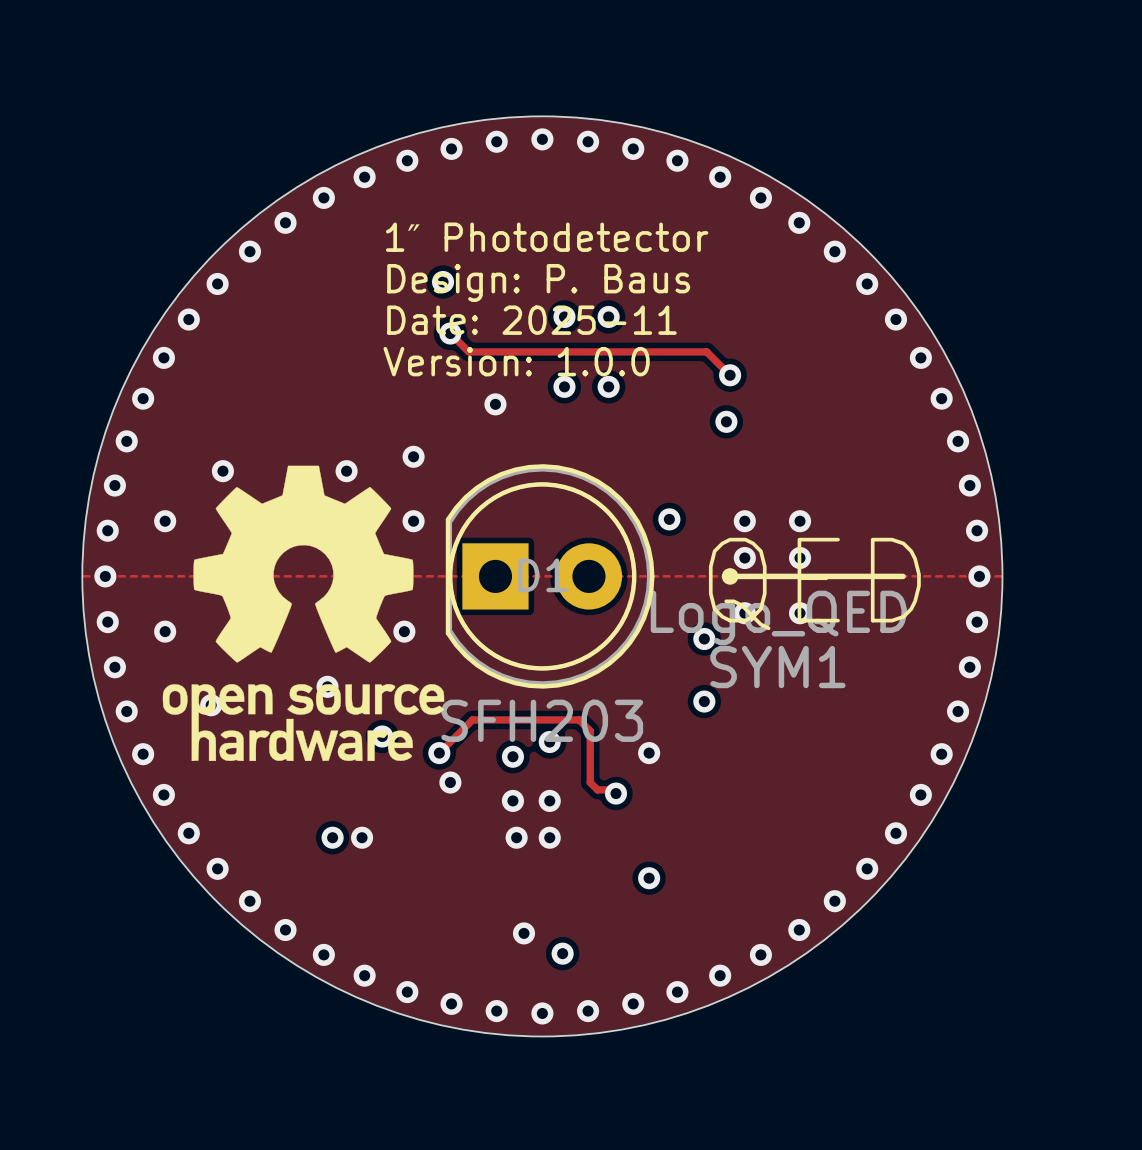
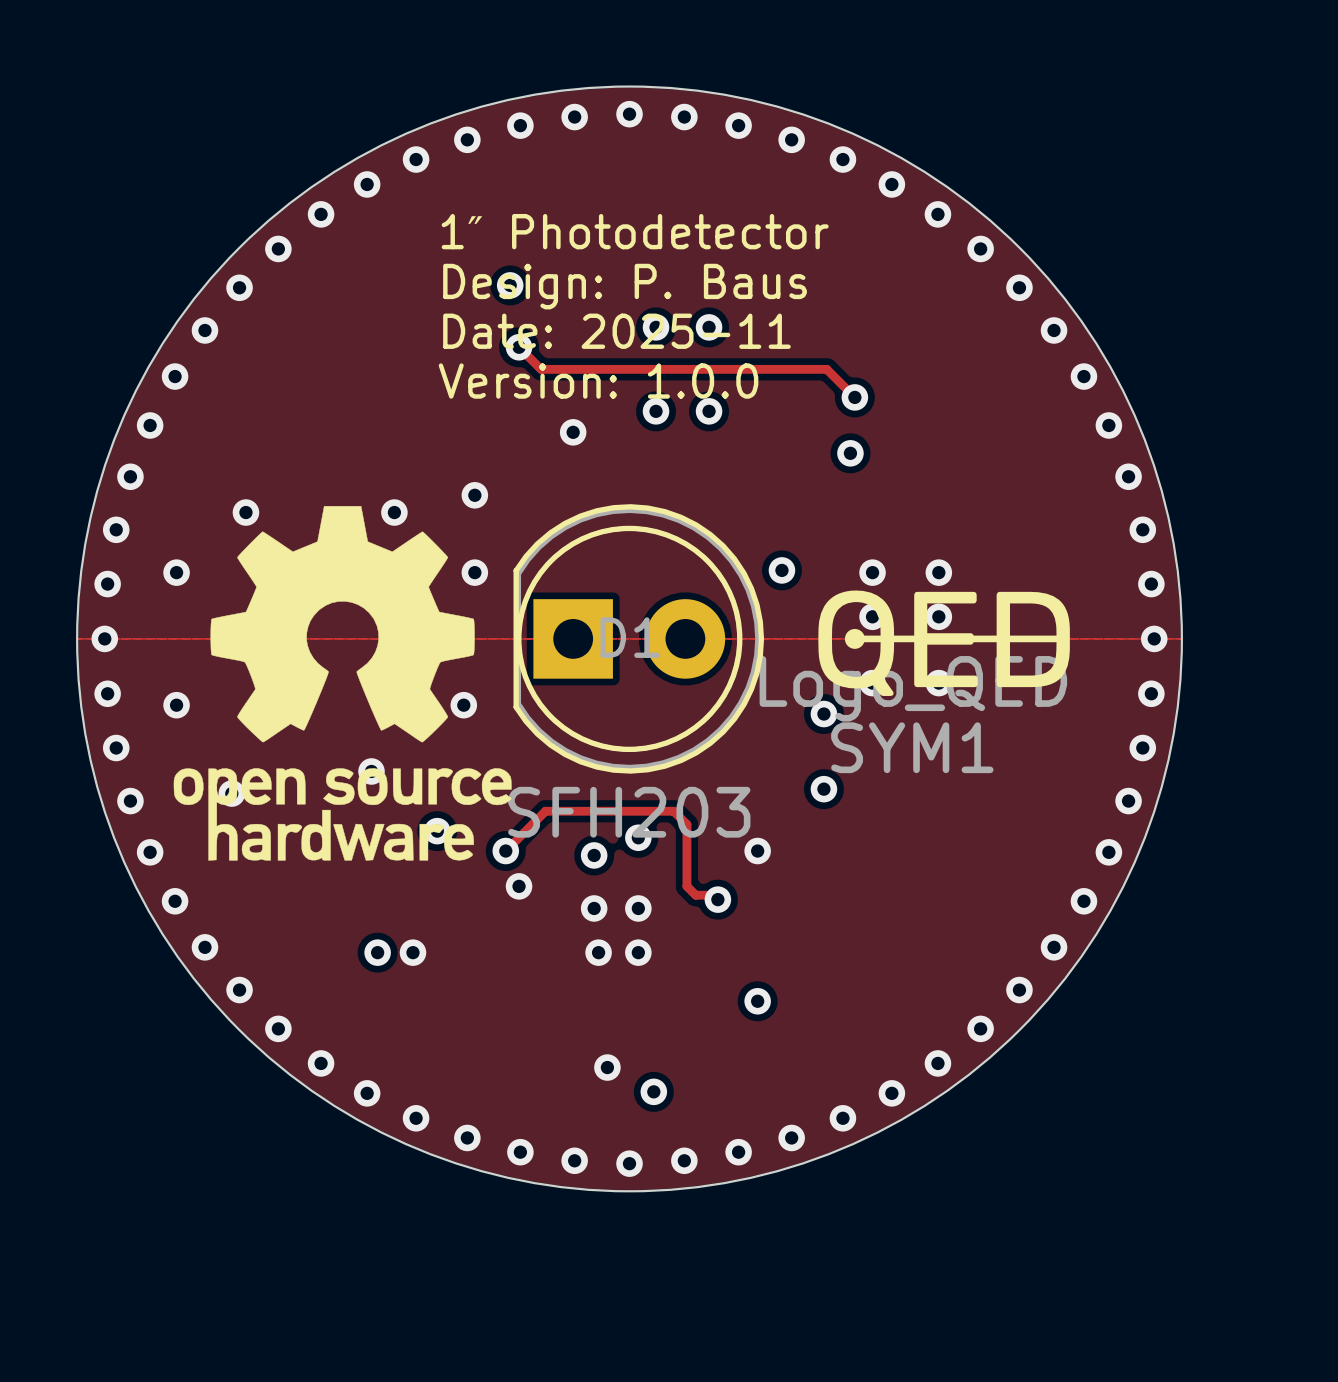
SYM1 footprint: [721, 568, 906, 585] -> [818, 590, 1070, 696]

